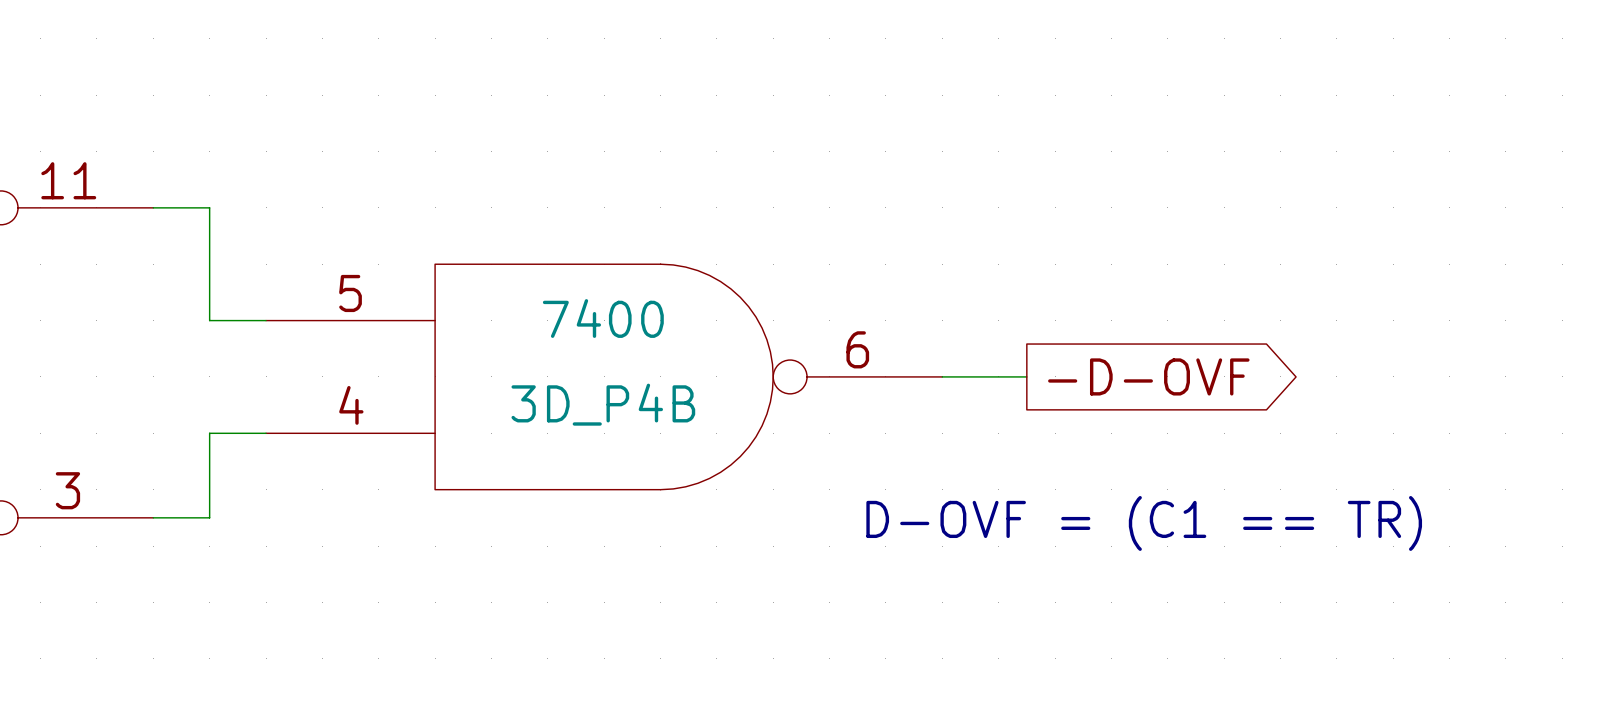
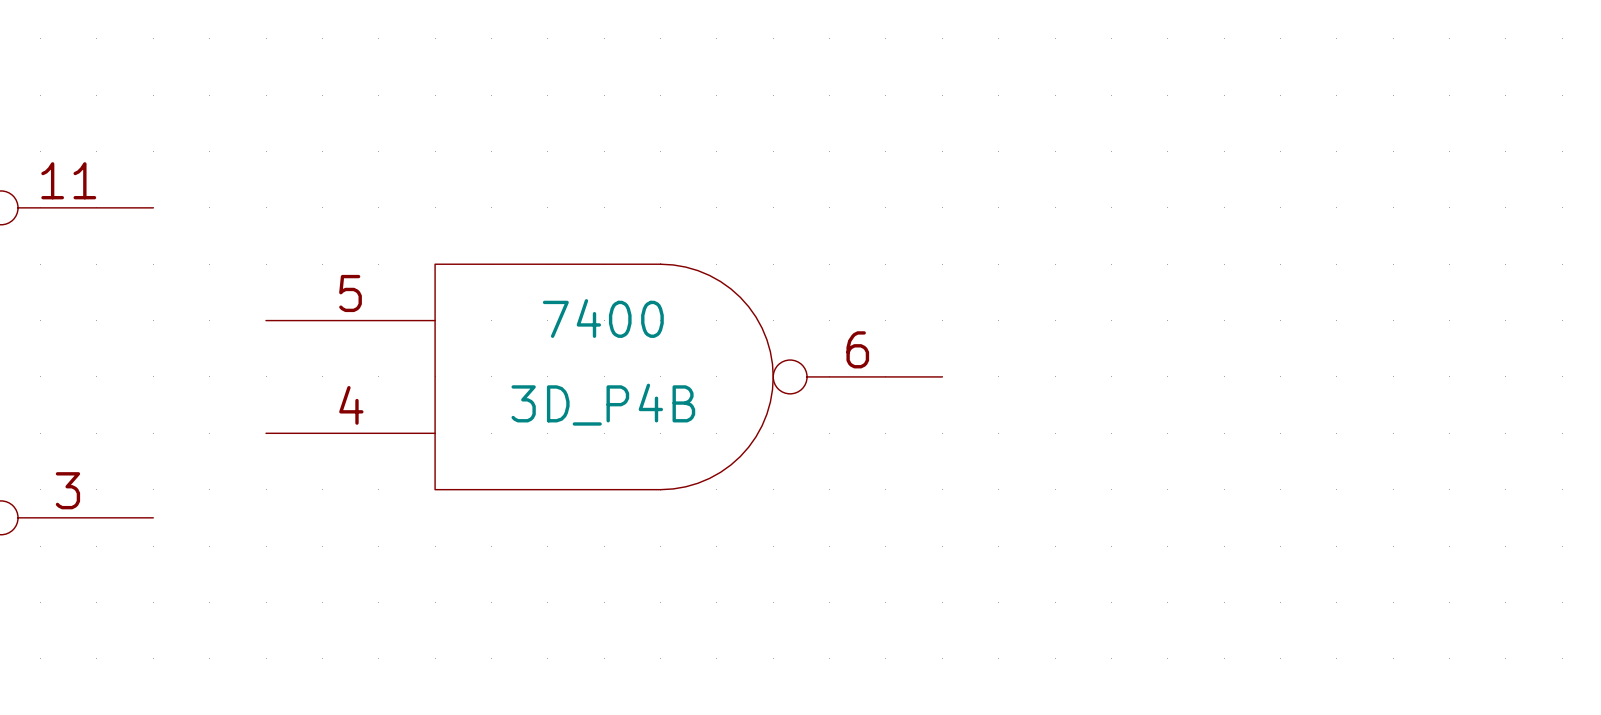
wire: (153, 207) (209, 207) (209, 320) (266, 320) -> none
wire: (942, 376) (1026, 376) -> none
global label: -D-OVF (1148, 376) -> none
wire: (266, 433) (209, 433) (209, 517) (153, 517) -> none
text: D-OVF = (C1 == TR) (1144, 523) -> none

